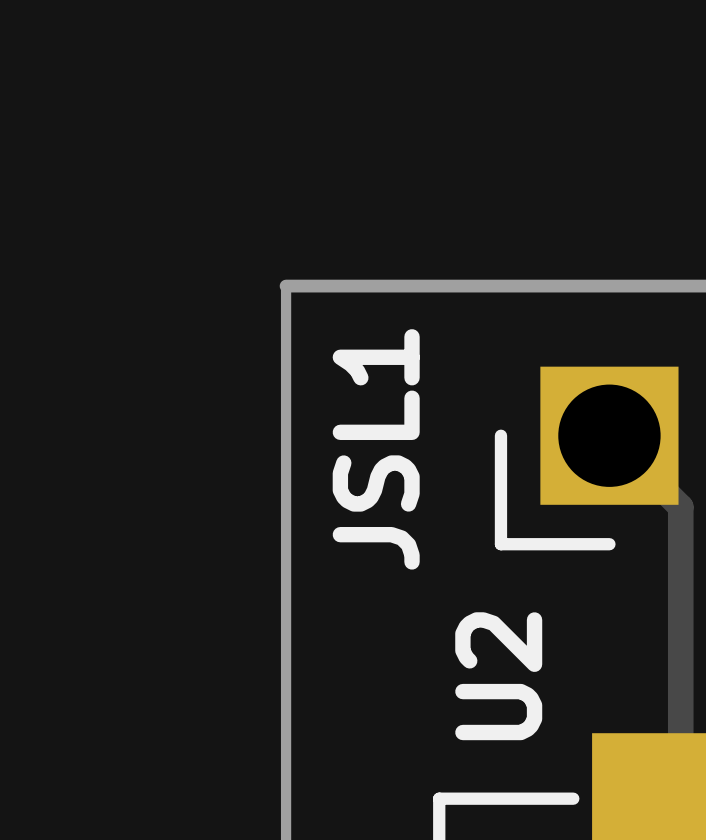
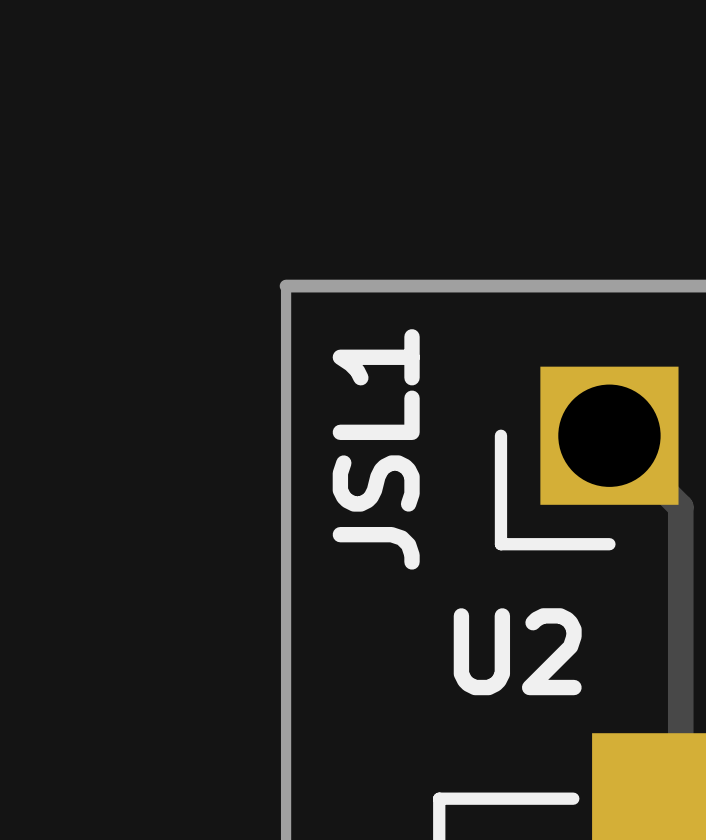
U2 name rotation: 0° (498, 676) -> 90° clockwise (517, 651)

